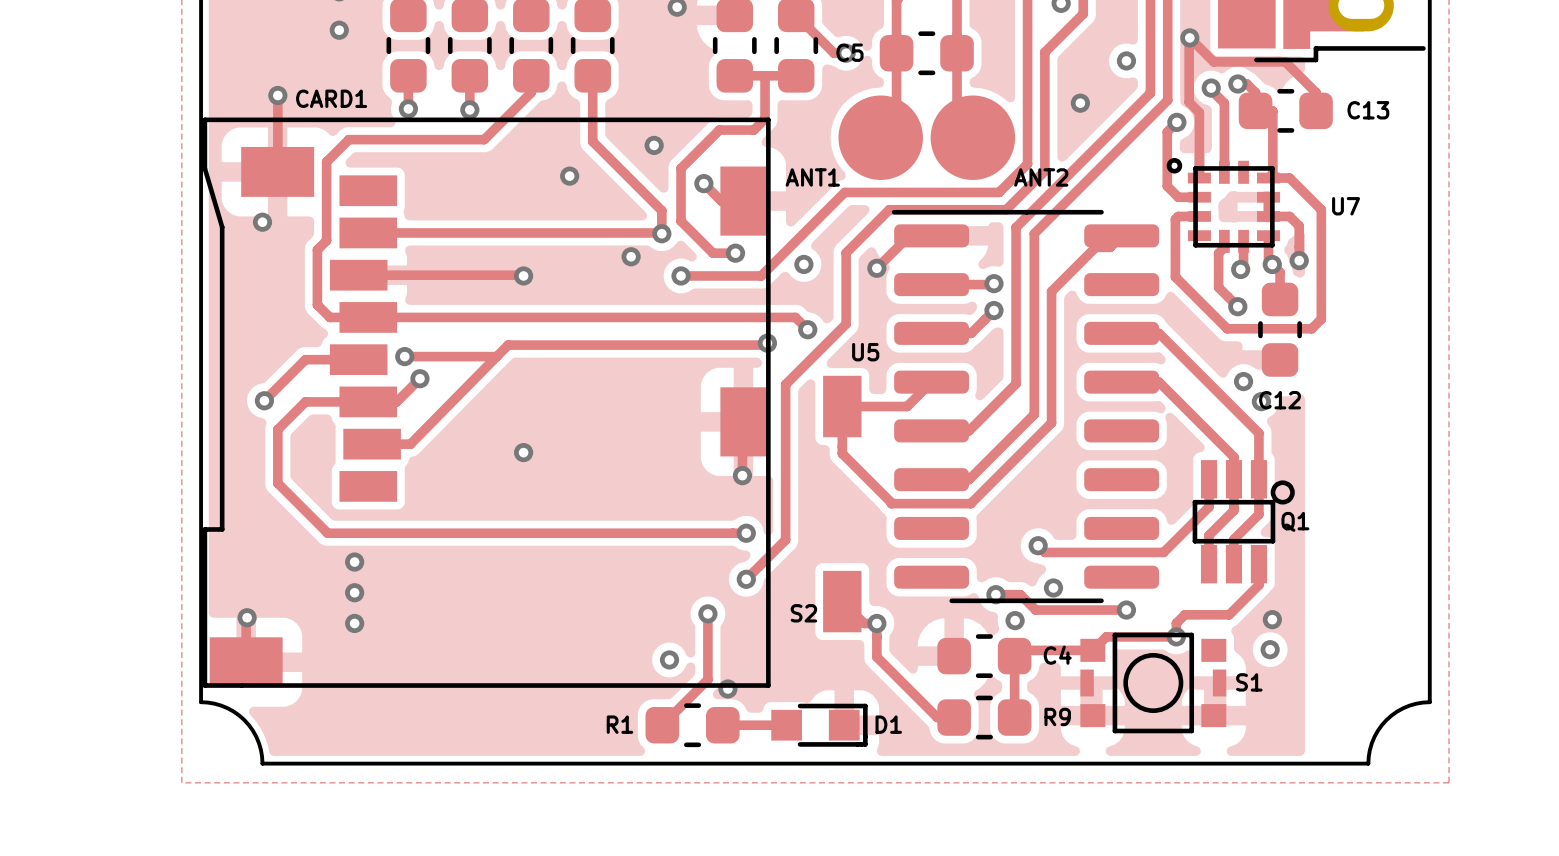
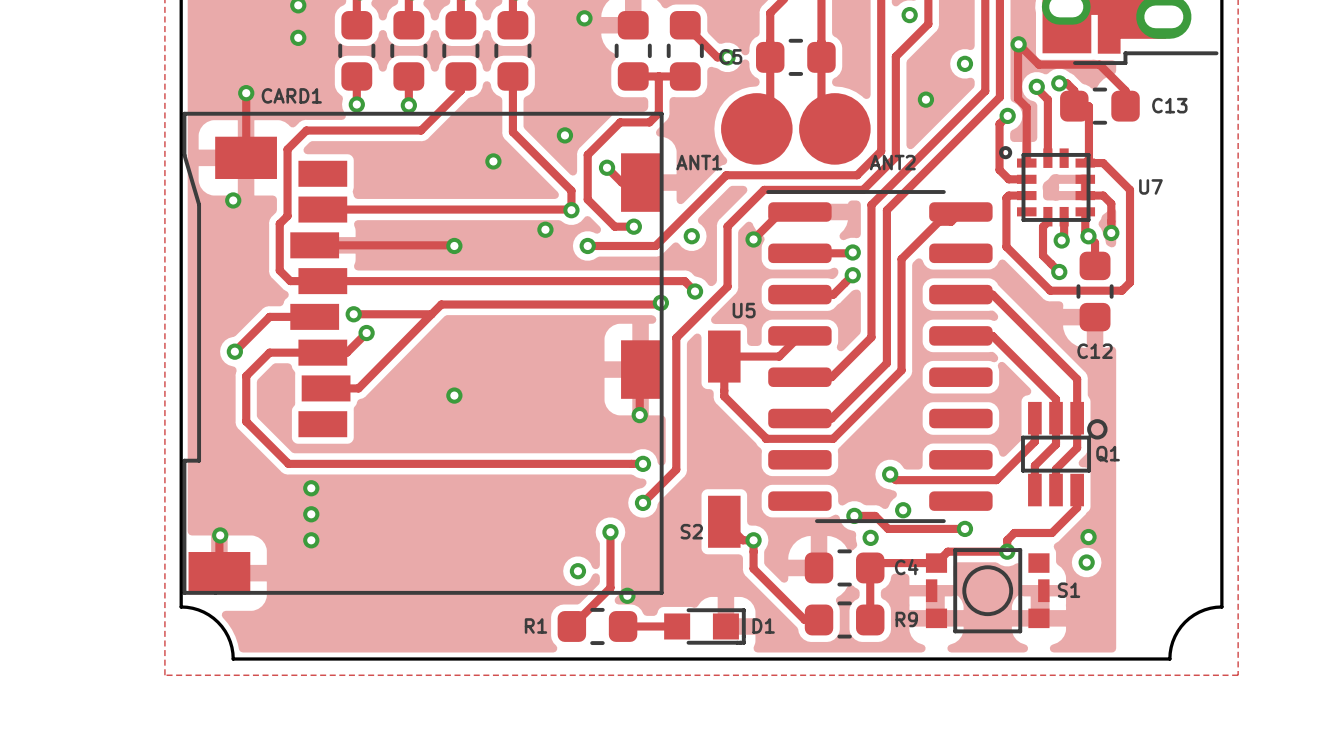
via: (1243, 381) -> none
via: (1261, 401) -> none

